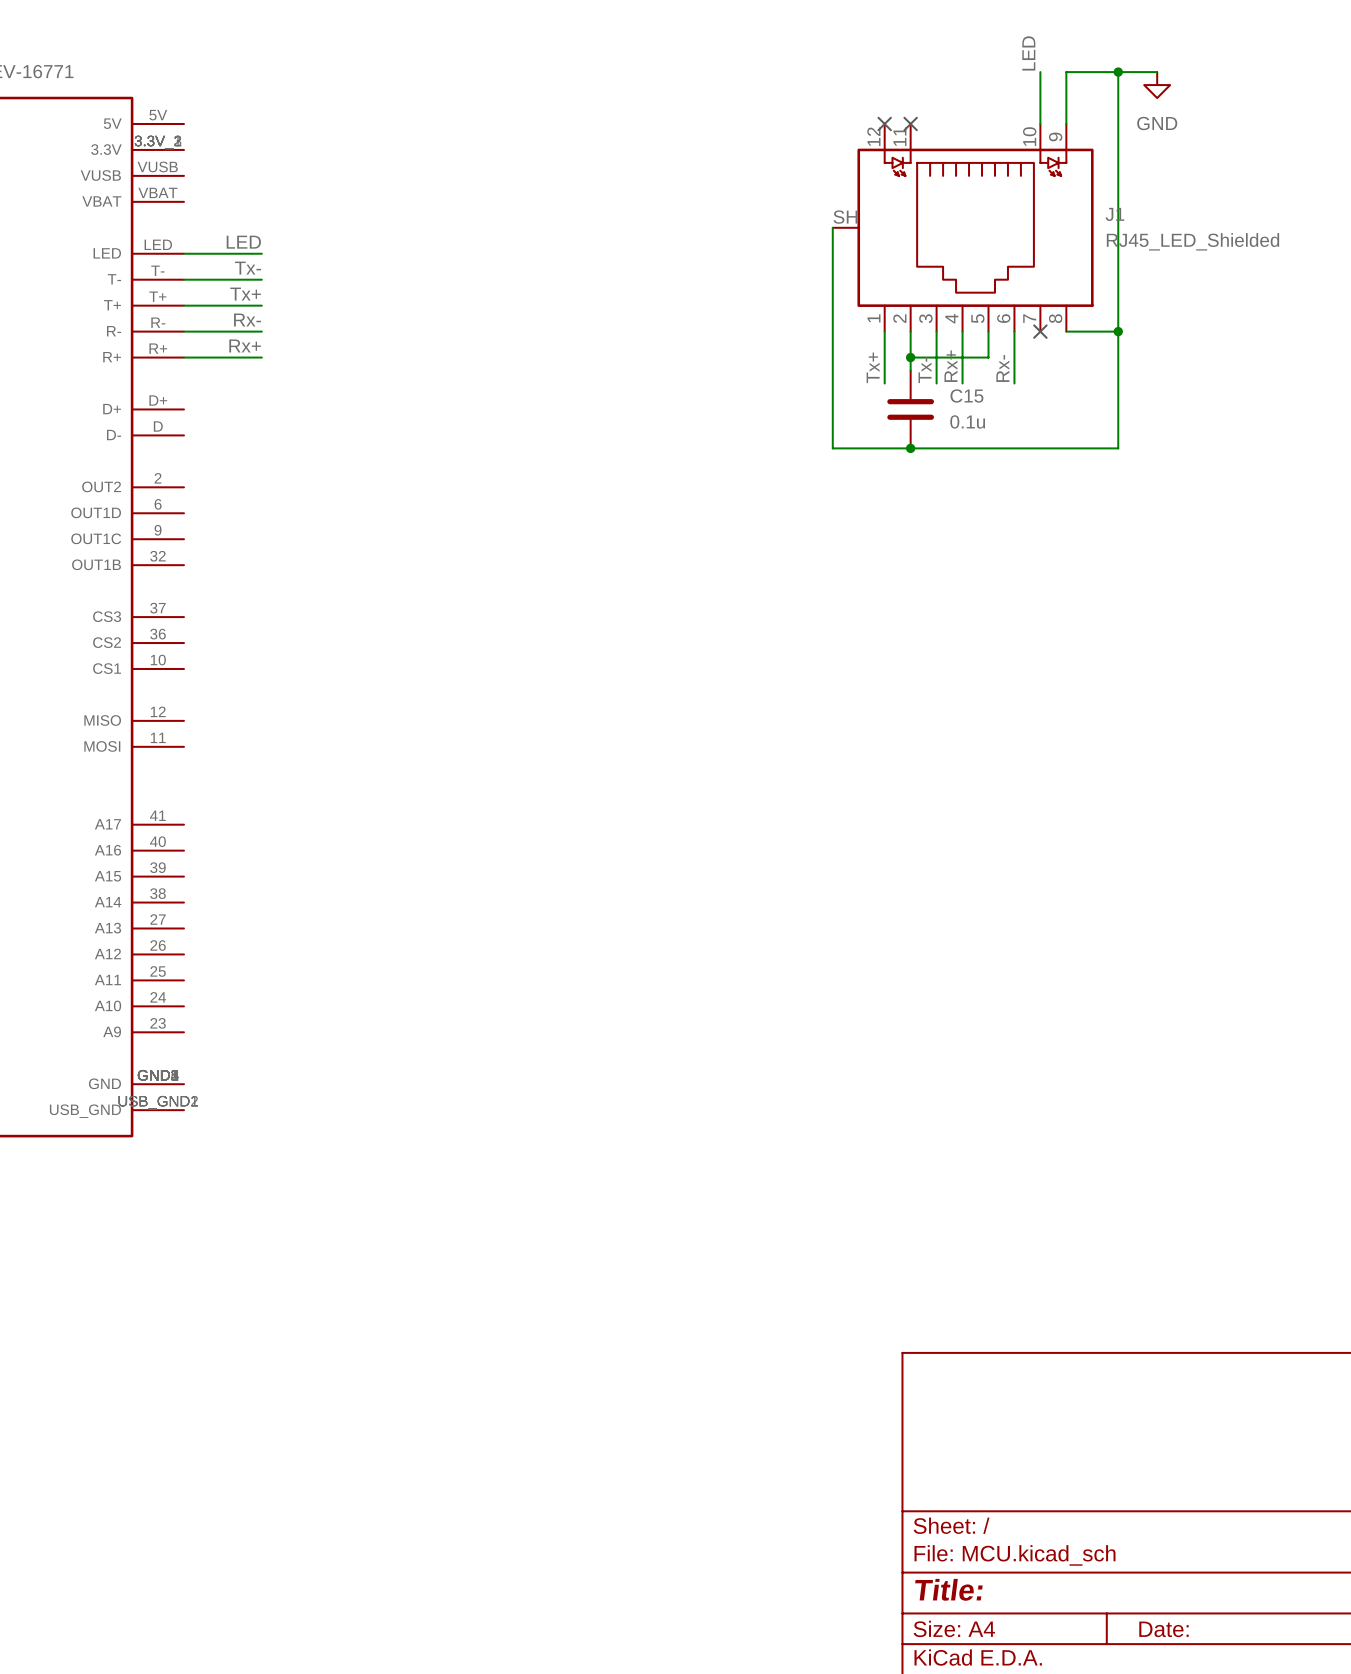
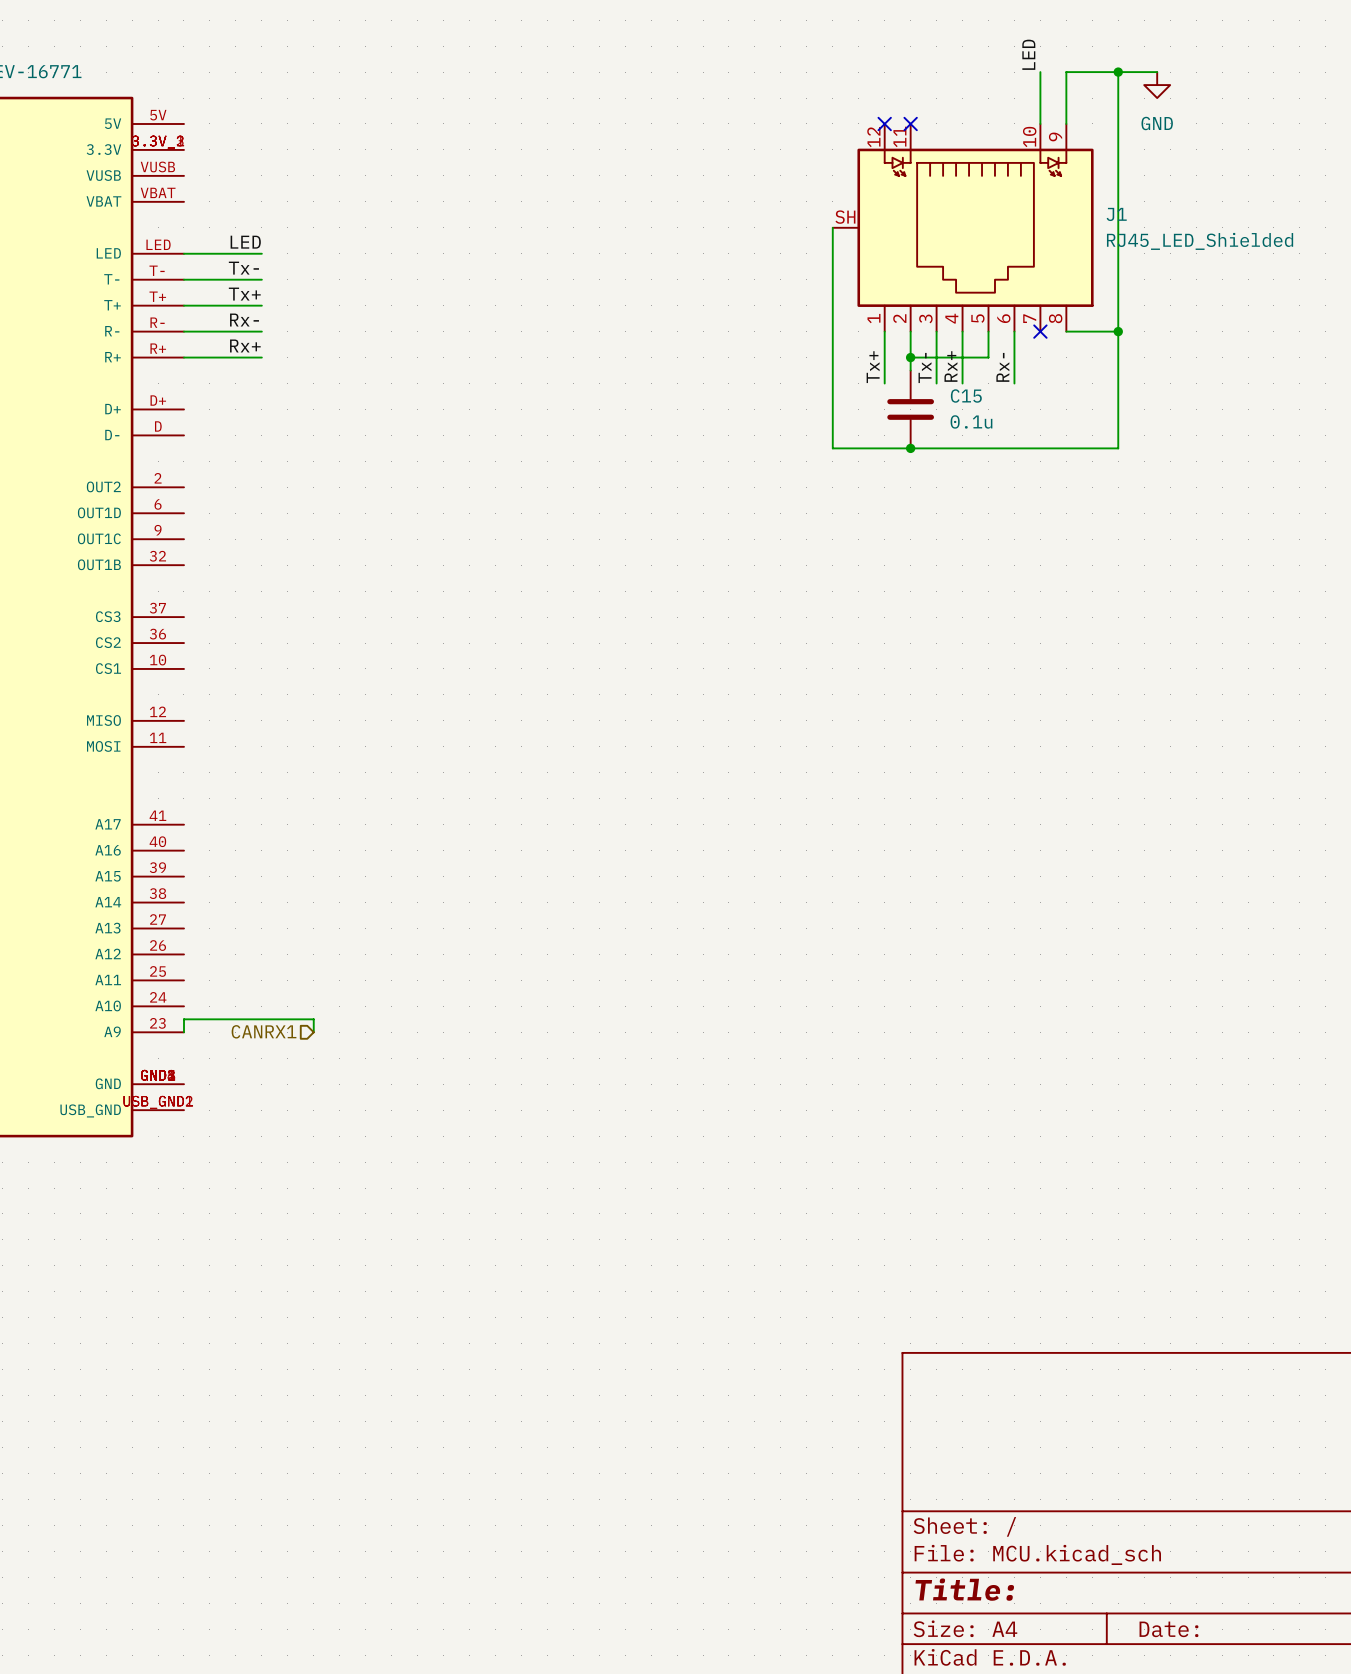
hierarchical label: none -> CANRX1 (264, 1031)
wire: none -> (183, 1032) (183, 1019) (313, 1019) (313, 1032)

